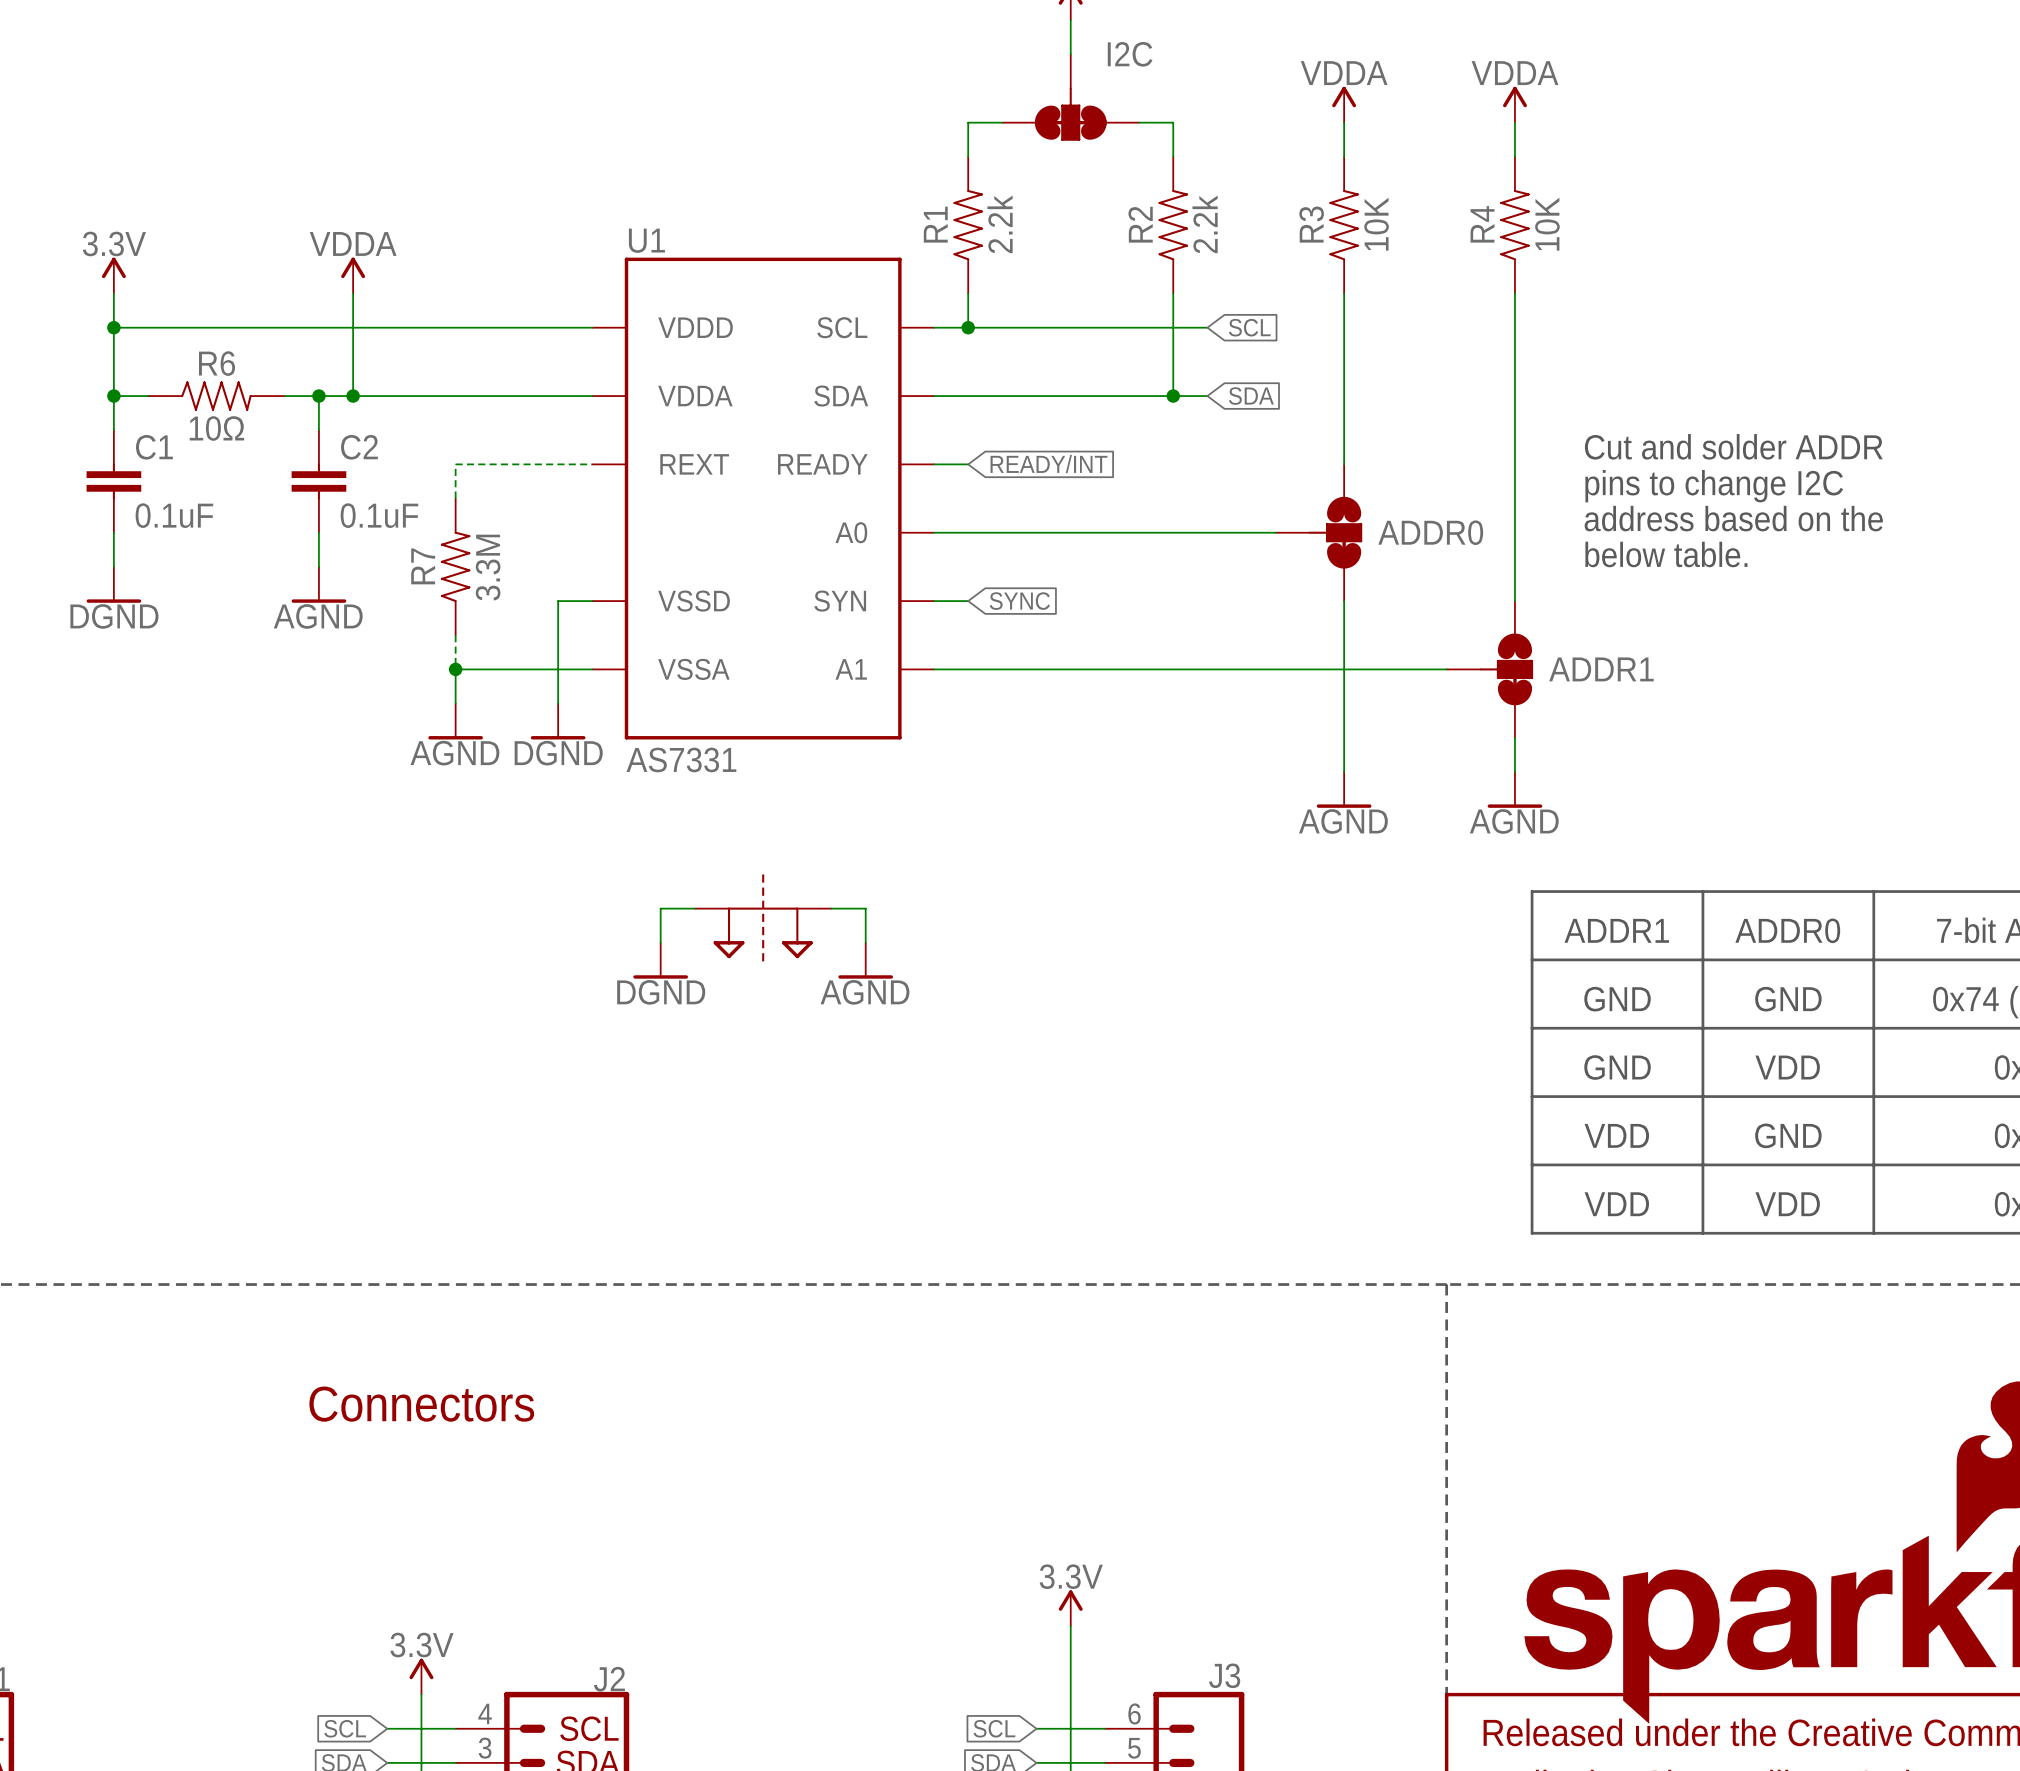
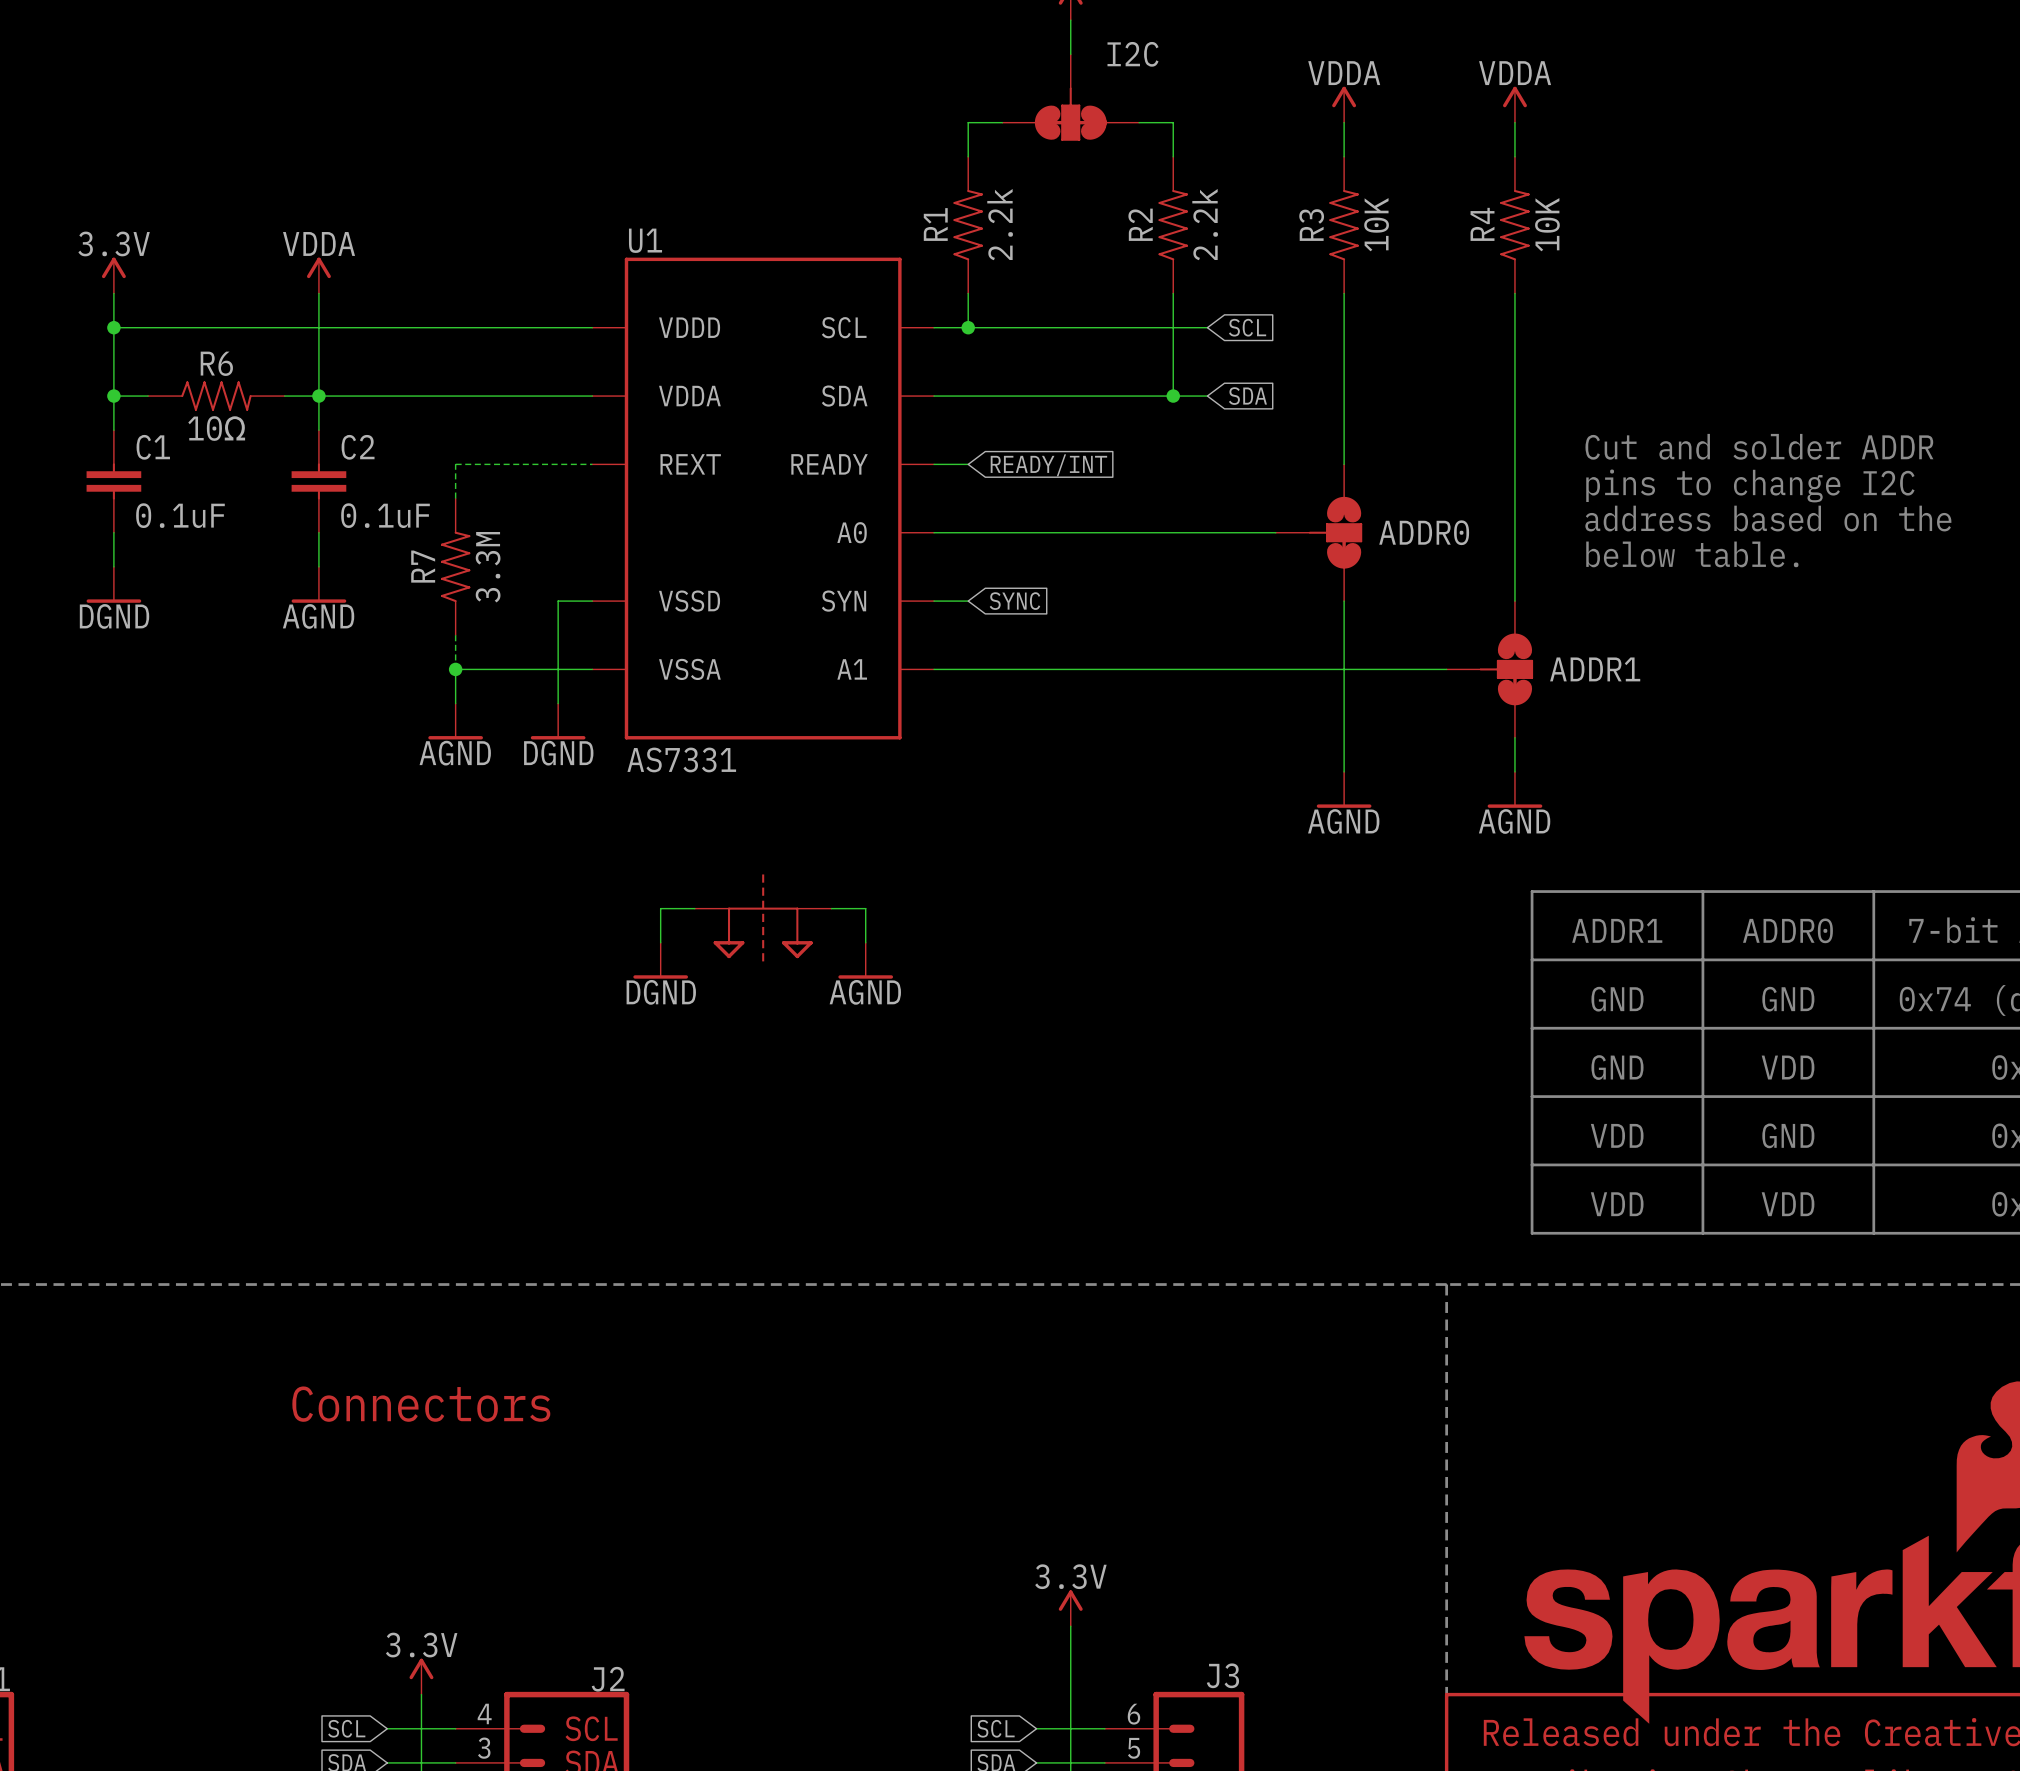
power symbol position: VDDA (353, 275) -> VDDA (318, 275)
wire: (353, 293) (353, 396) -> (318, 293) (318, 396)
junction: (353, 396) -> none

